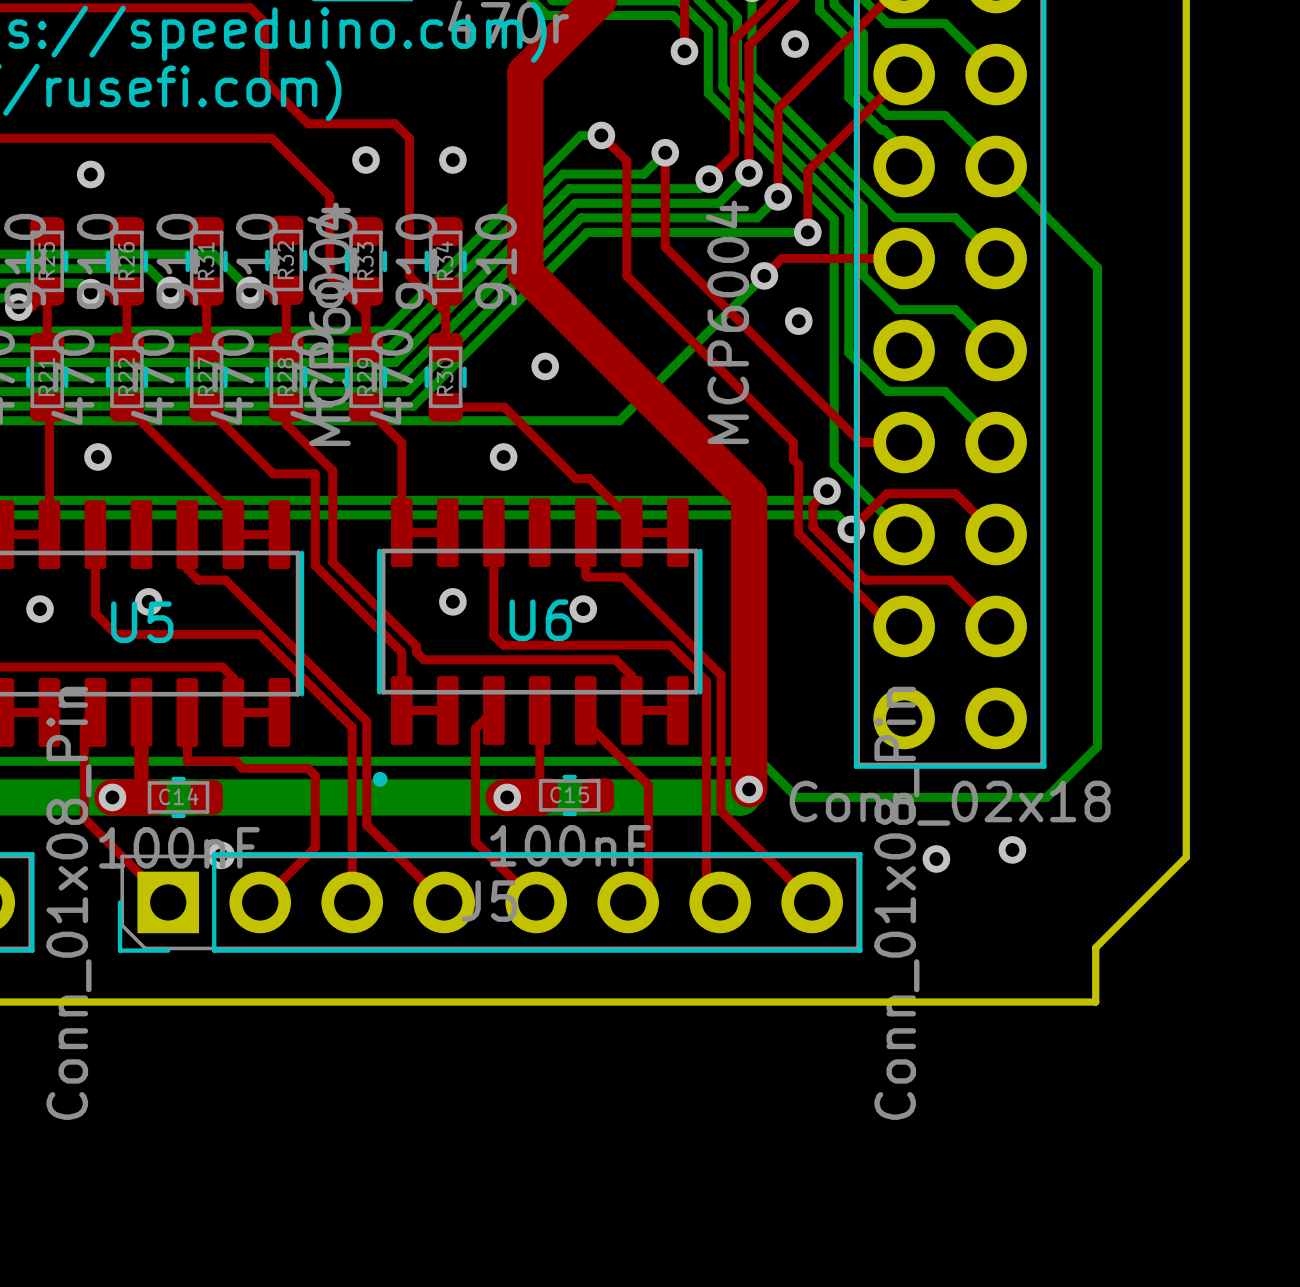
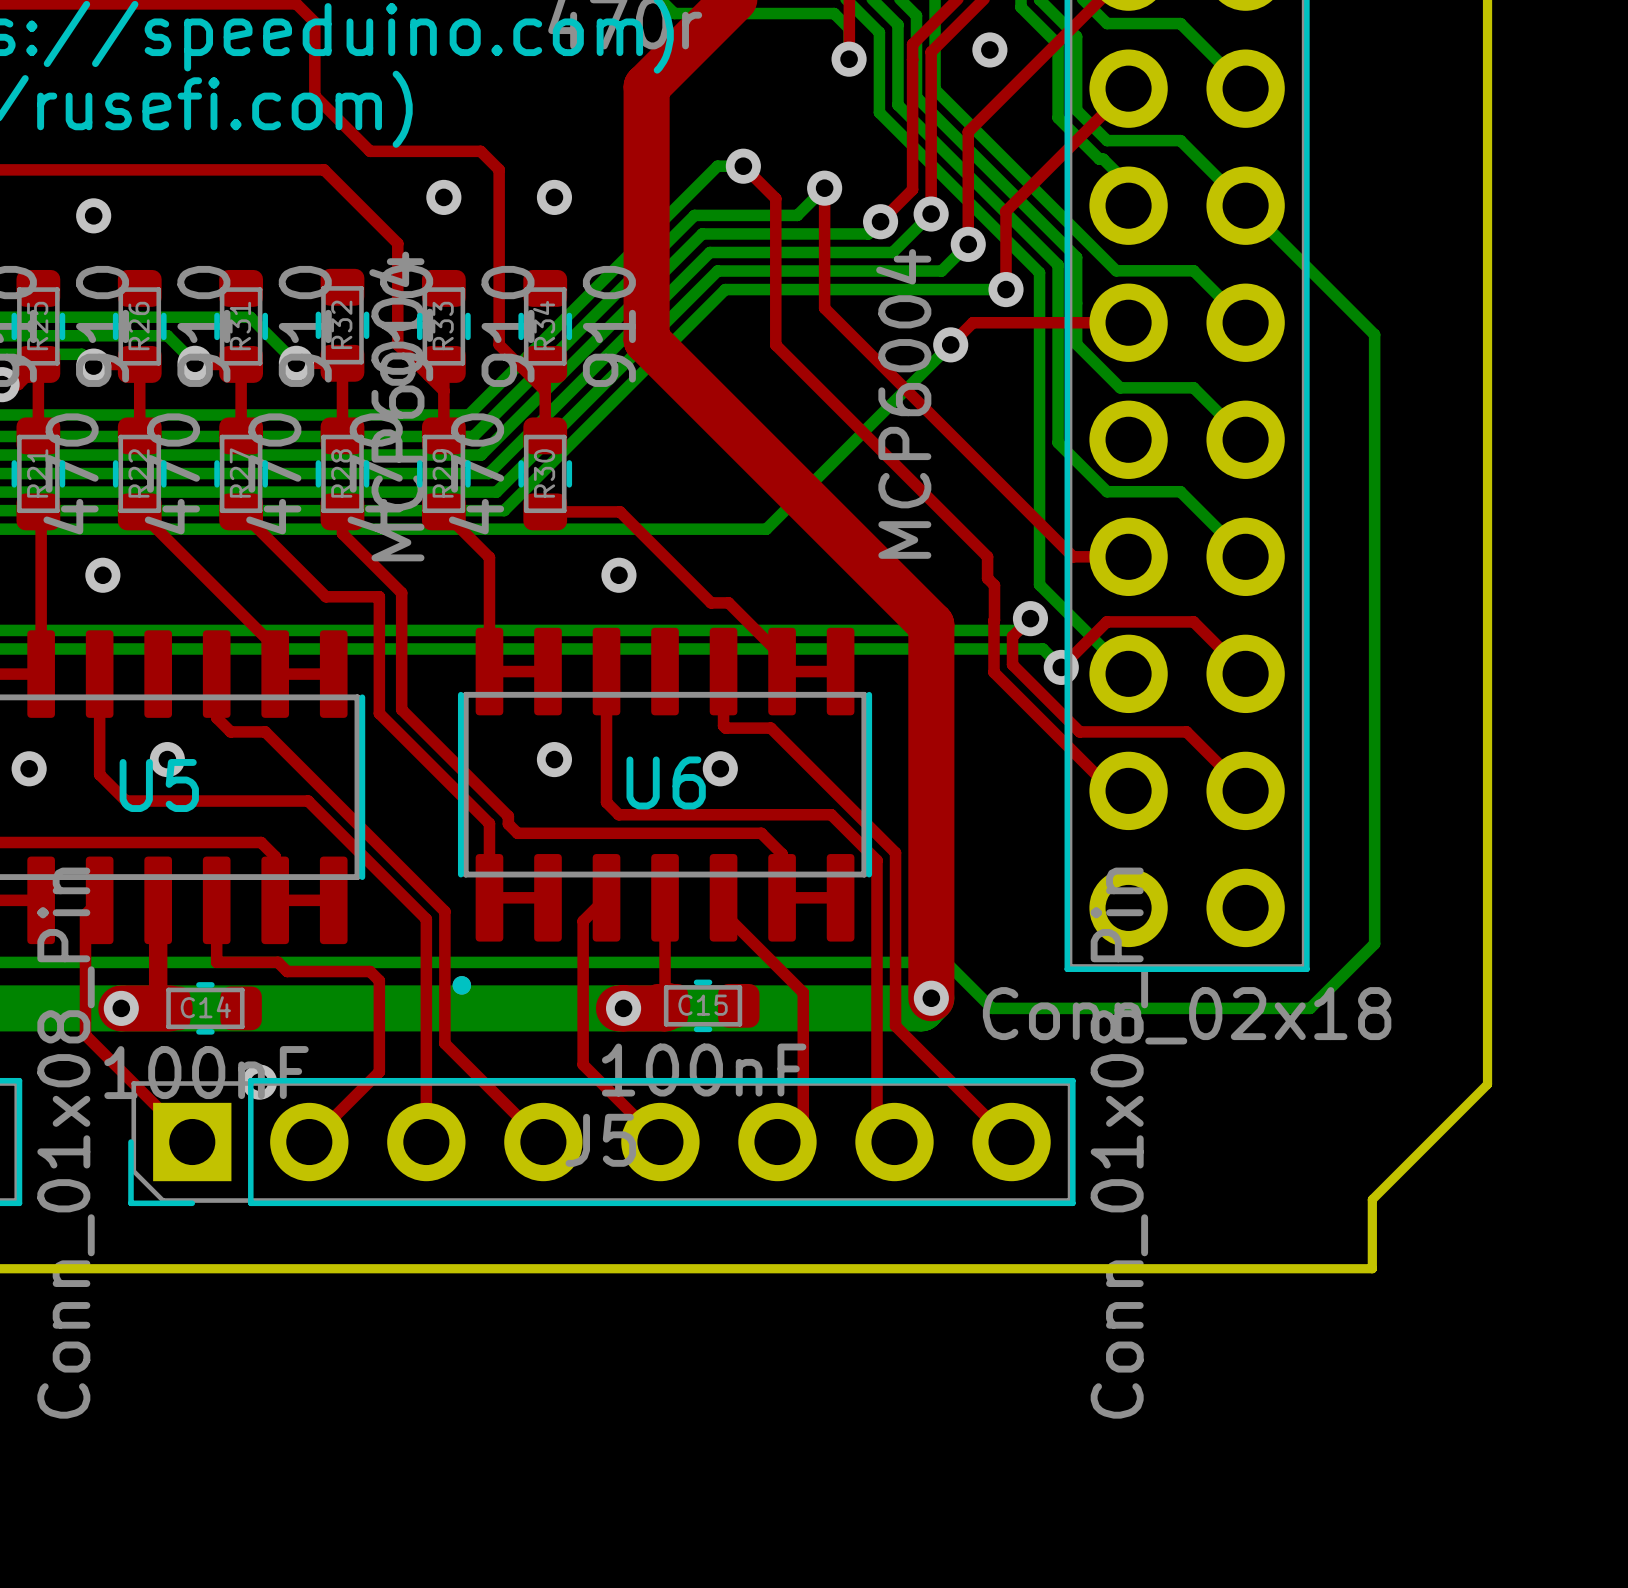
via: (798, 321) -> none
via: (545, 366) -> none
via: (1012, 849) -> none
via: (936, 858) -> none

